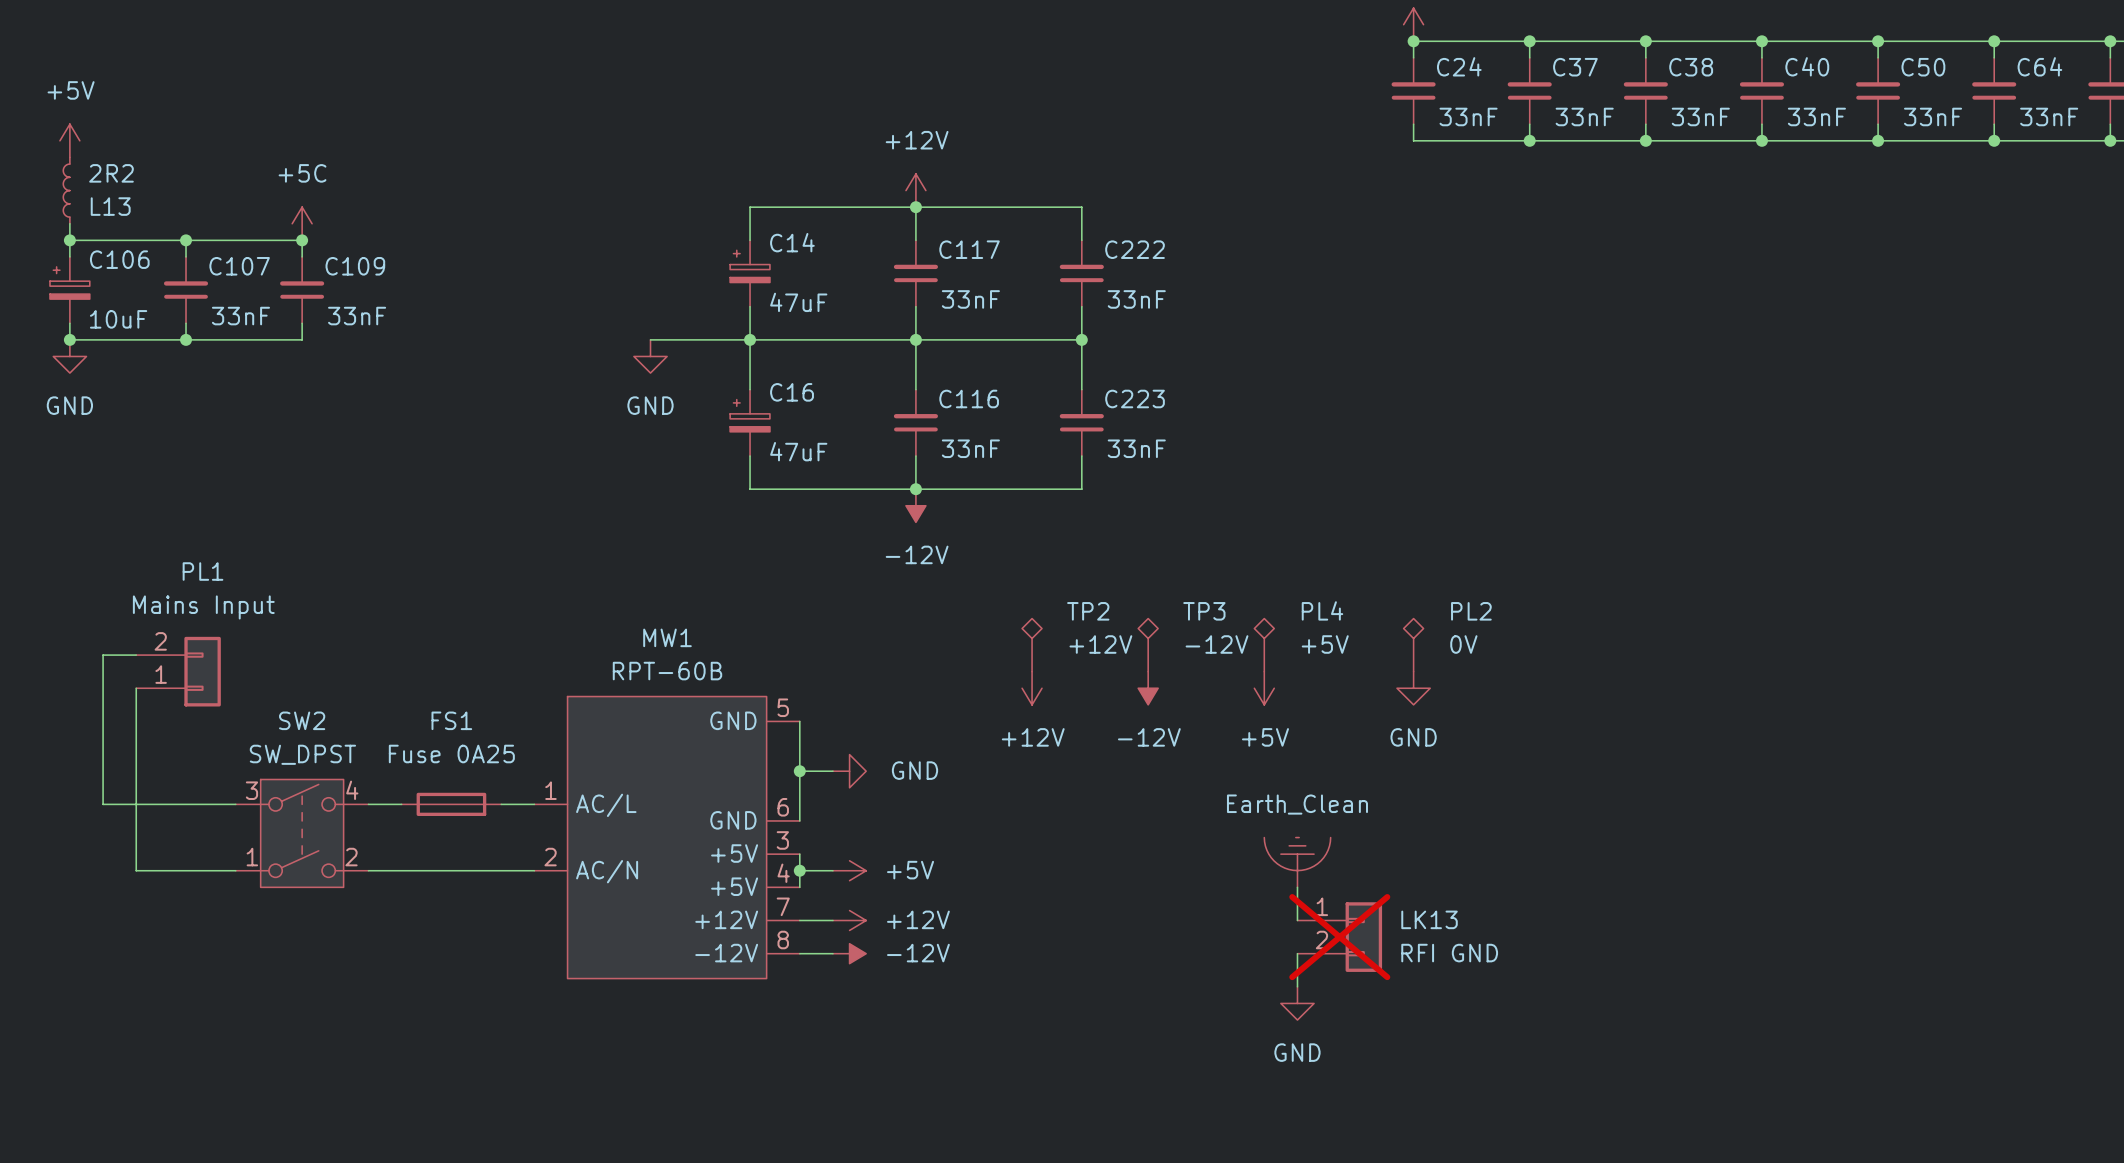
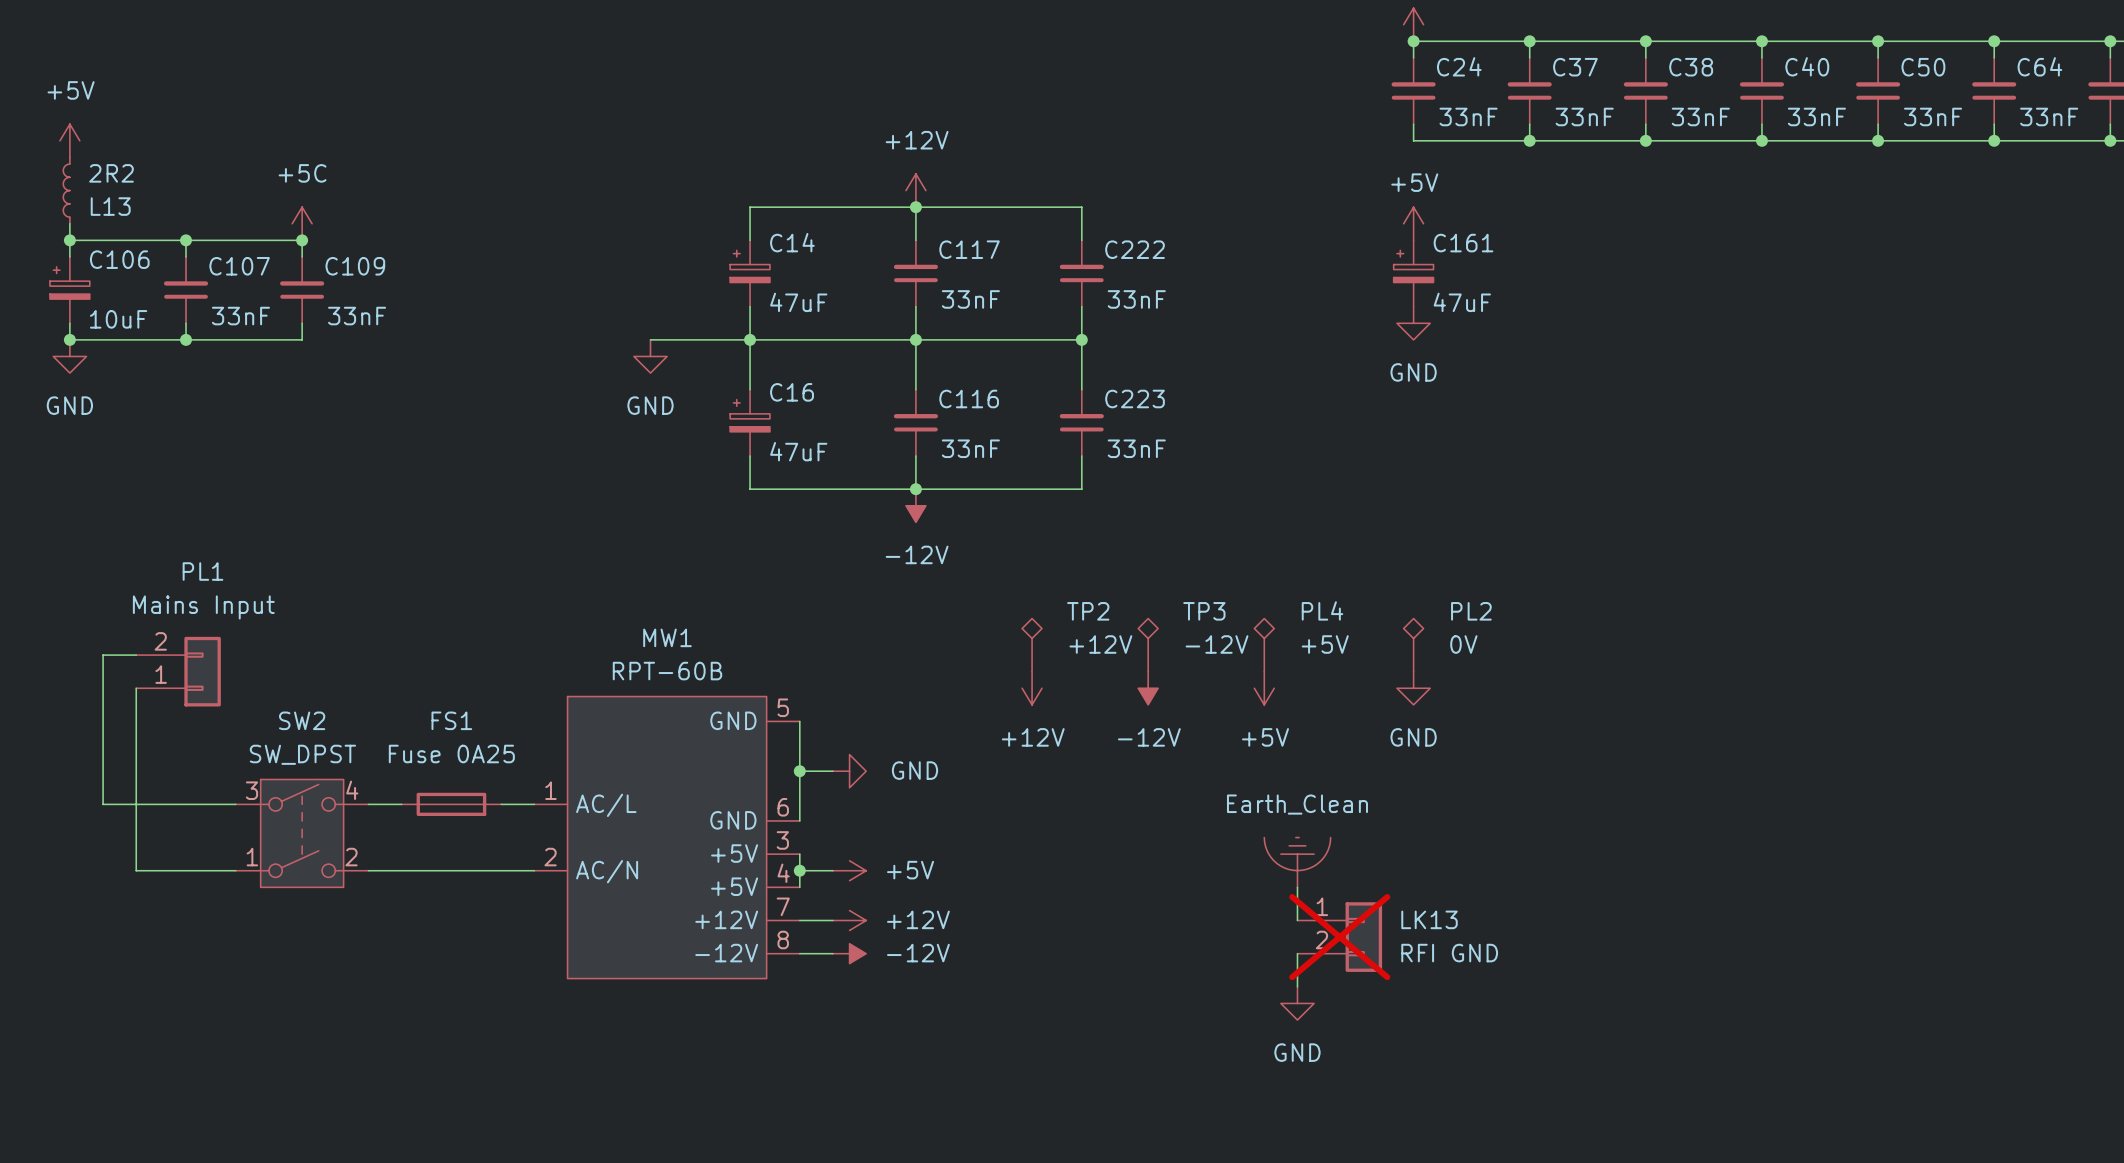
power symbol: none -> +5V (1413, 223)
C161: none -> 47uF (1413, 273)
power symbol: none -> GND (1413, 323)

